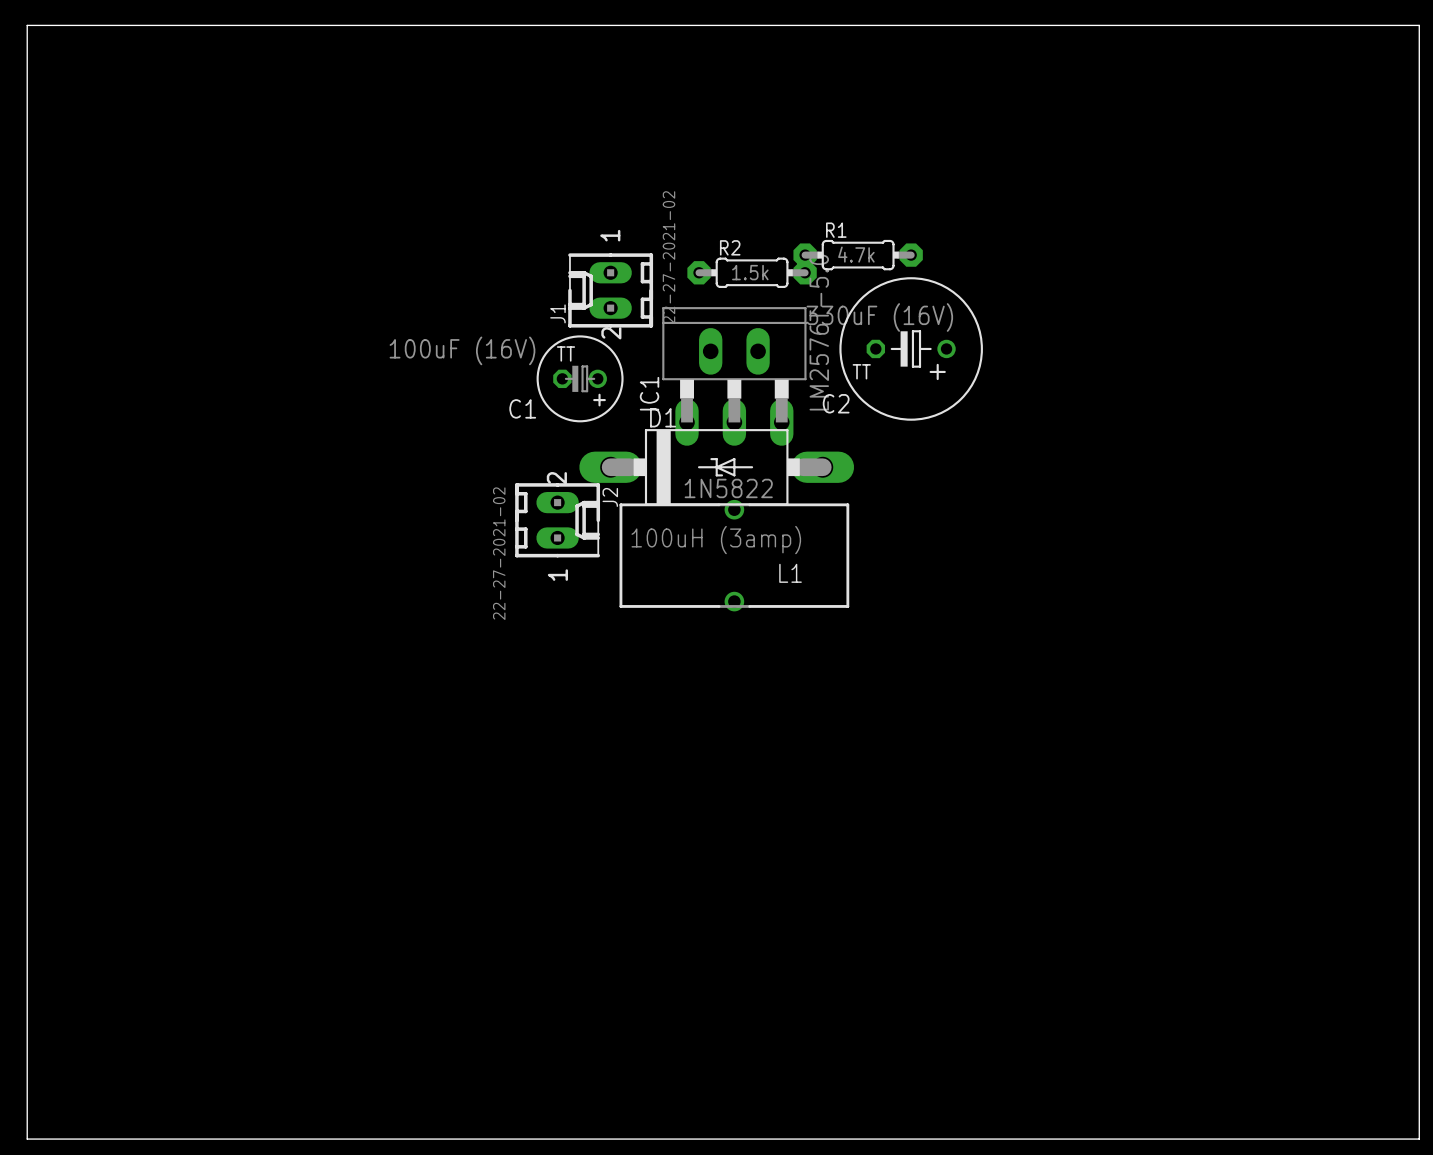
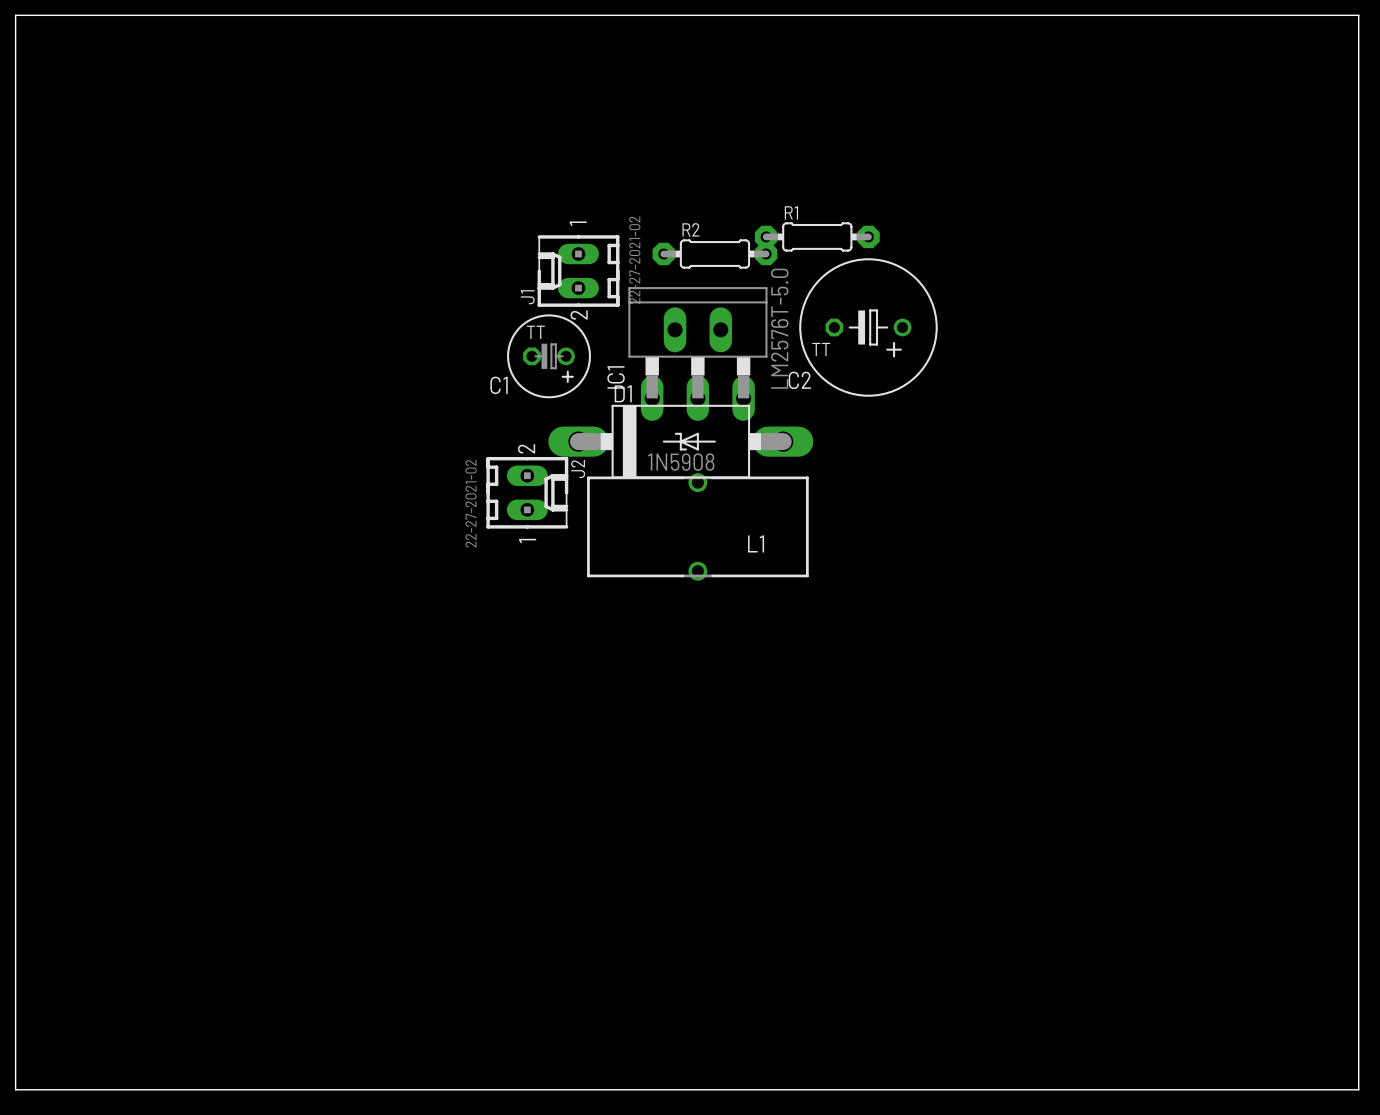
R1 value: 4.7k (856, 254) -> none
R2 value: 1.5k (750, 272) -> none
C2 value: 330uF (16V) (879, 317) -> none
C1 value: 100uF (16V) (462, 350) -> none
D1 value: 1N5822 (728, 488) -> 1N5908 (681, 462)
L1 value: 100uH (3amp) (716, 540) -> none

